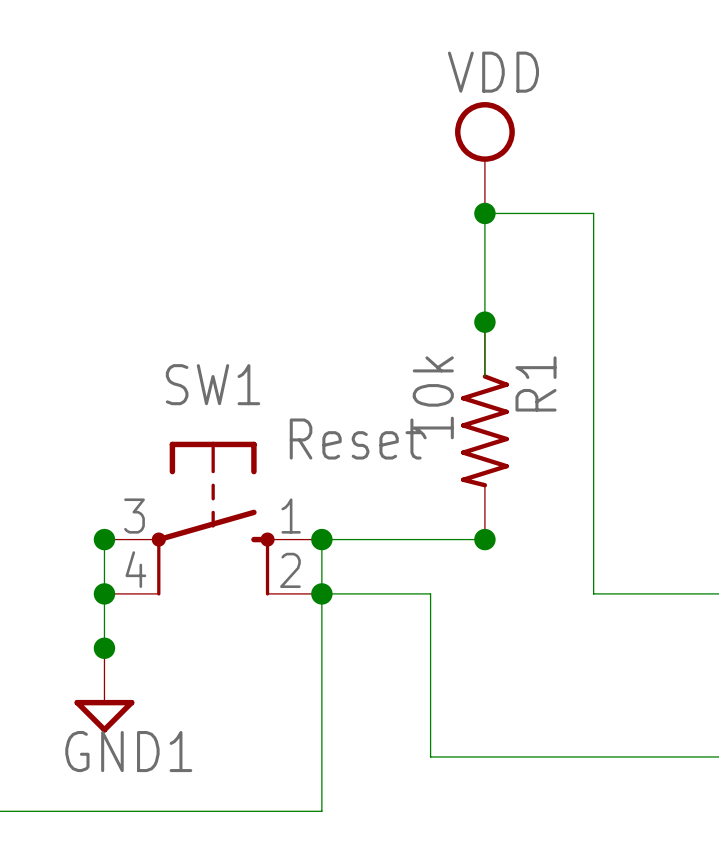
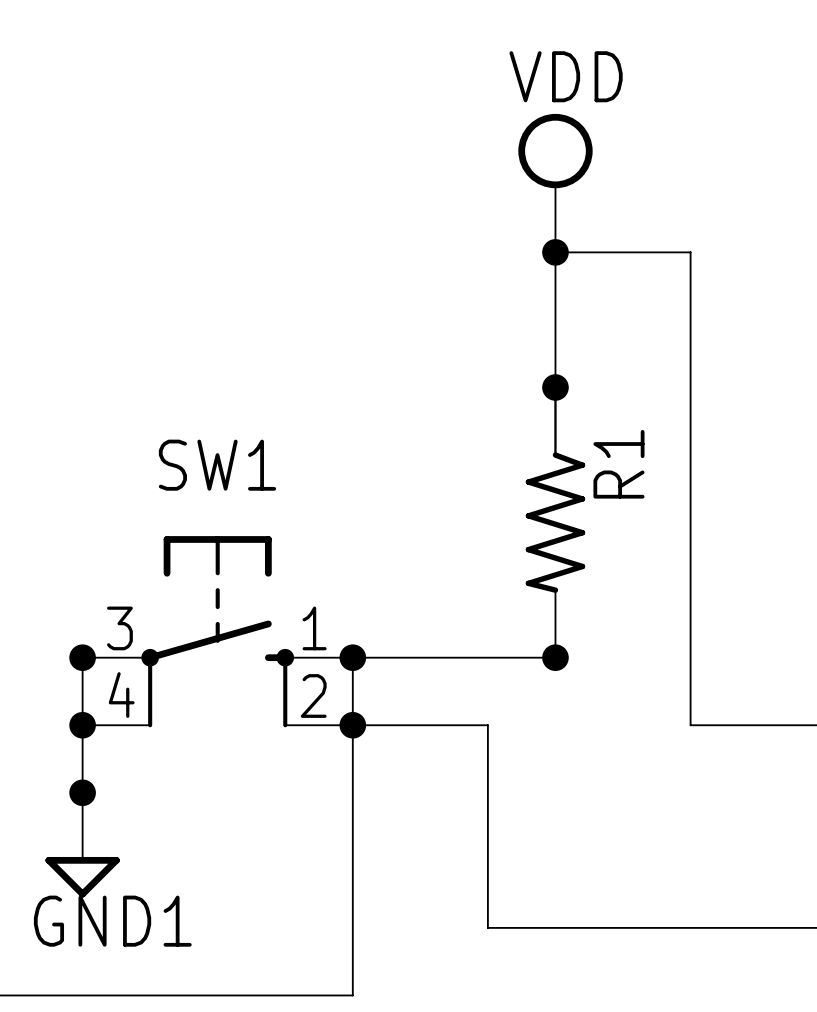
R1 value: 10k (433, 397) -> none
SW1 value: Reset (355, 439) -> none

